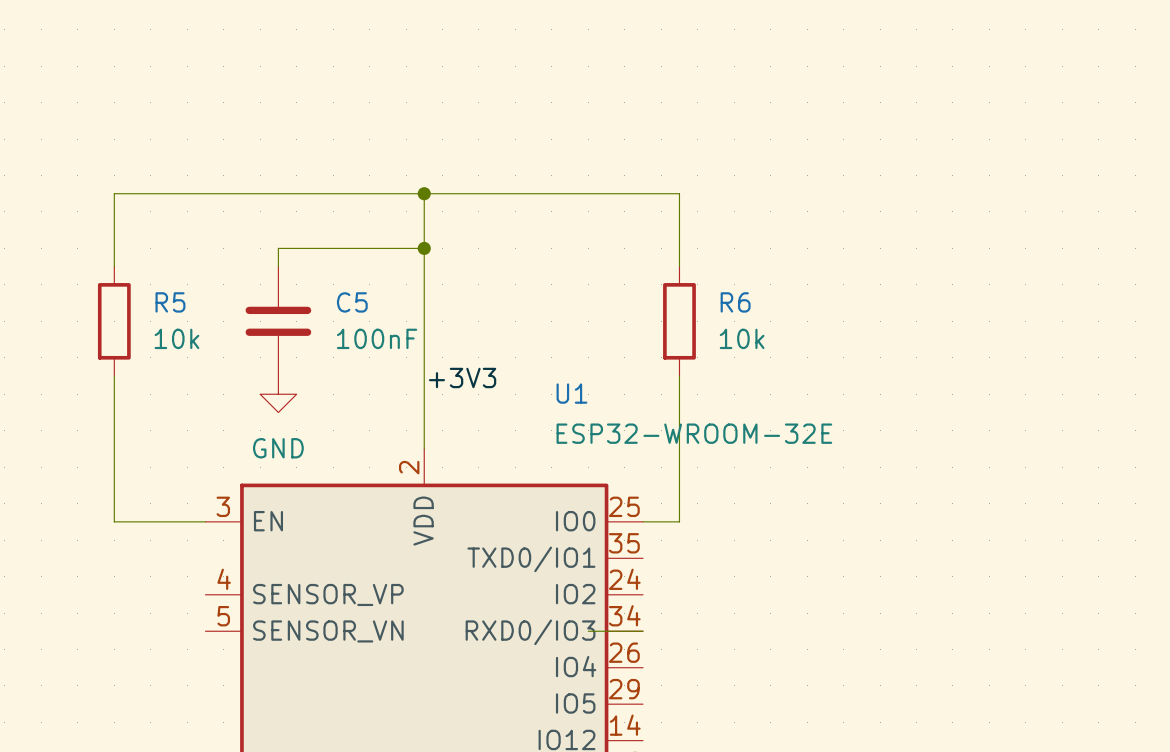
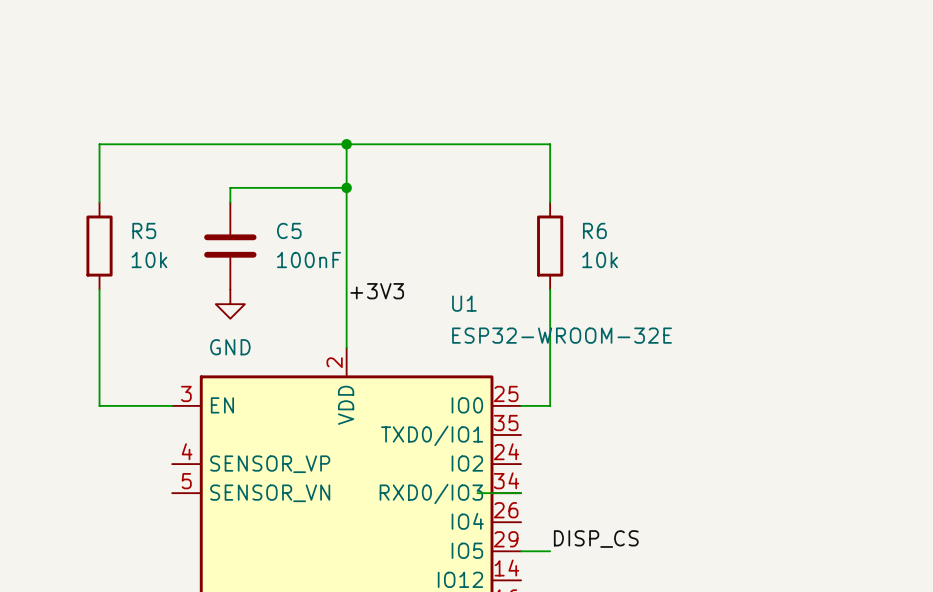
label: none -> DISP_CS (596, 539)
wire: none -> (521, 551) (550, 551)

